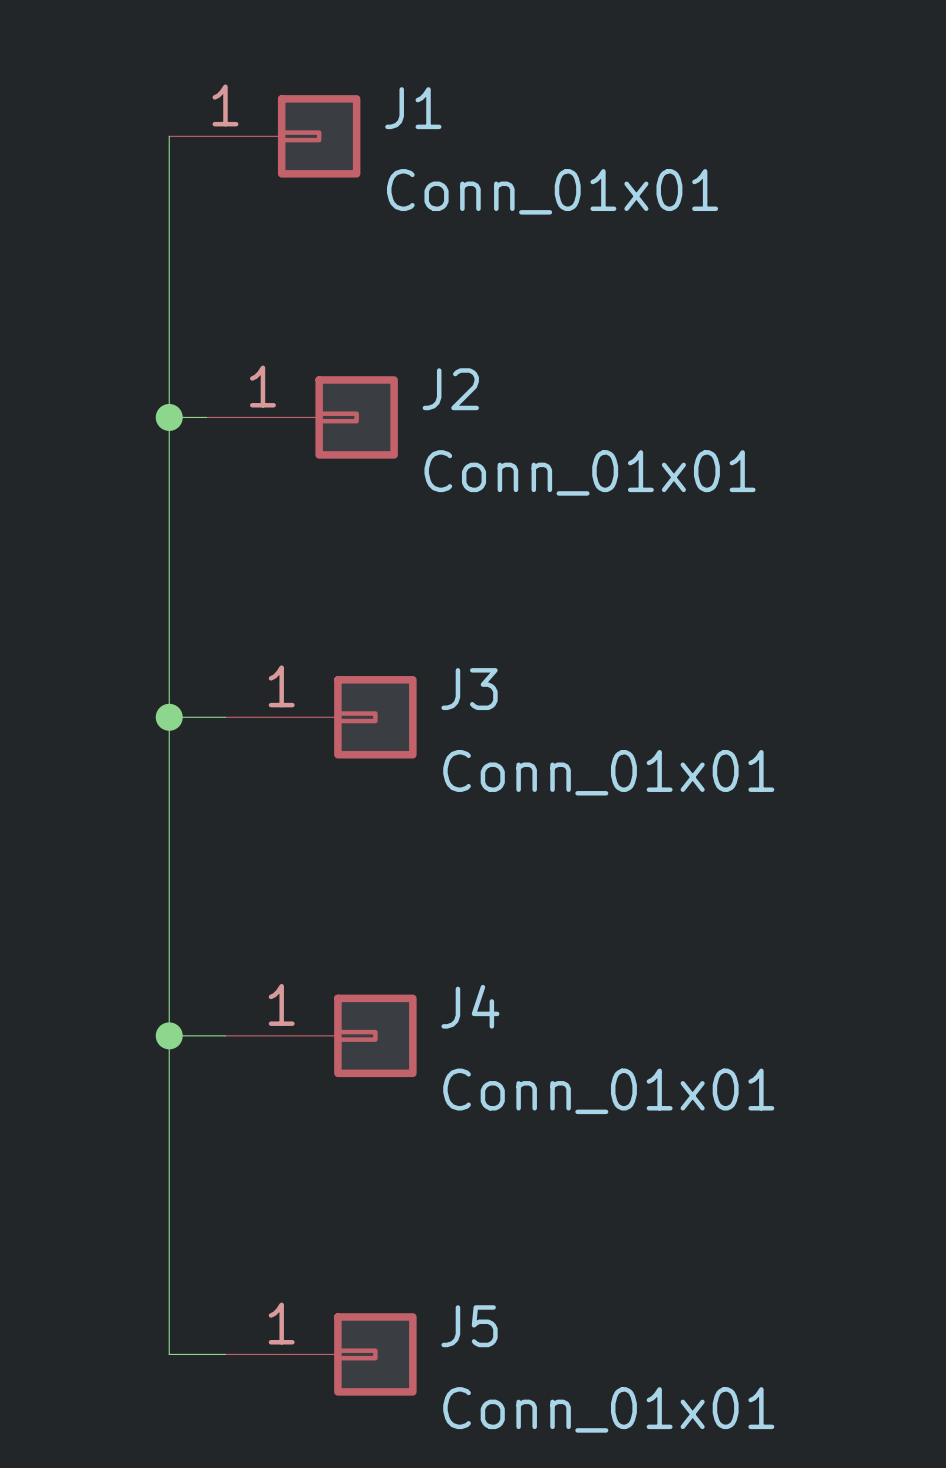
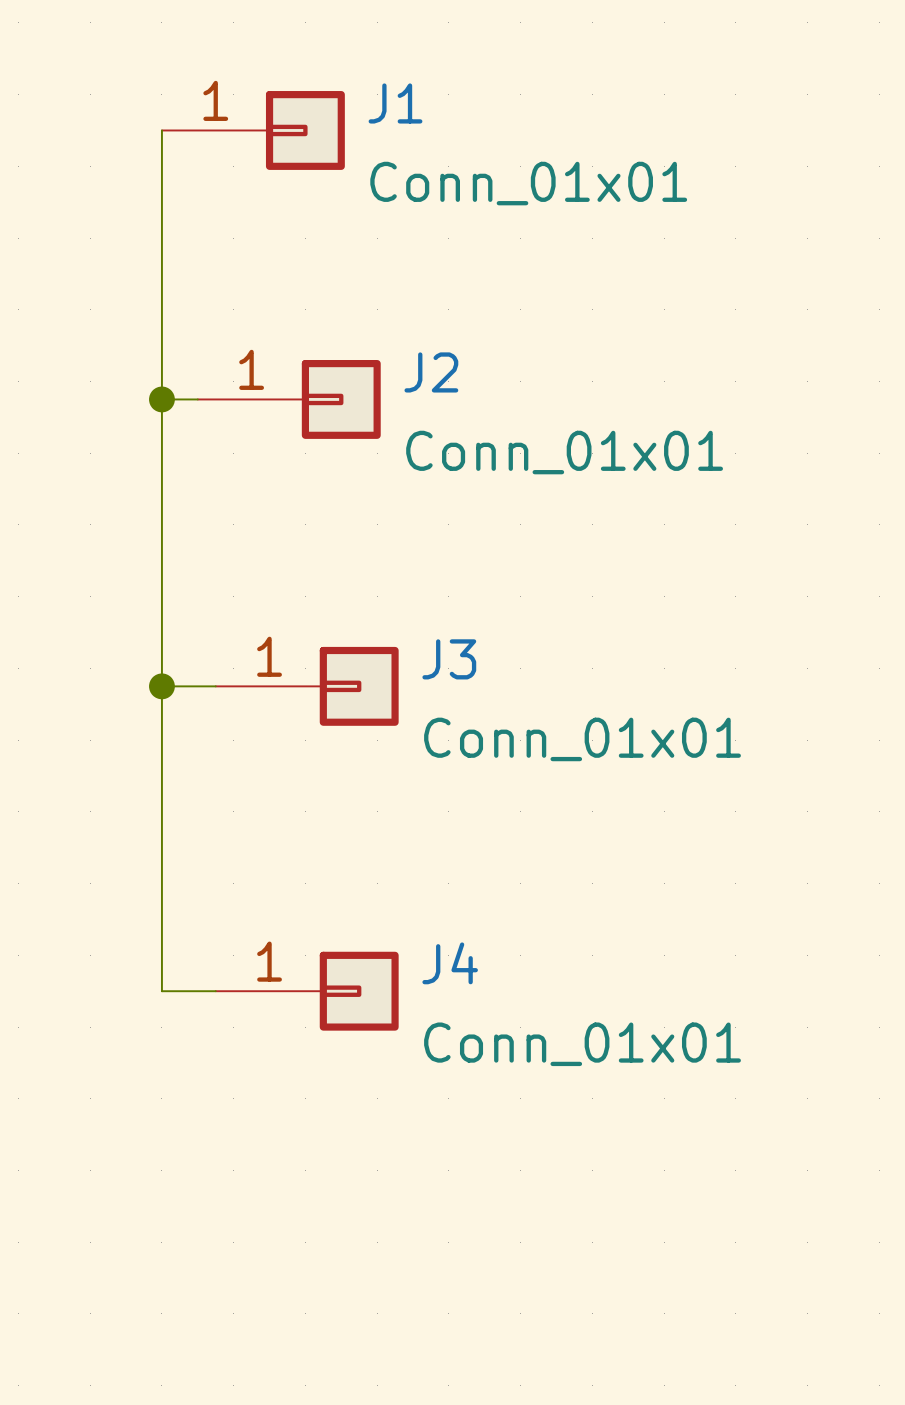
wire: (169, 1035) (169, 1354) (225, 1354) -> none
junction: (169, 1035) -> none
J5: Conn_01x01 (321, 1354) -> none

